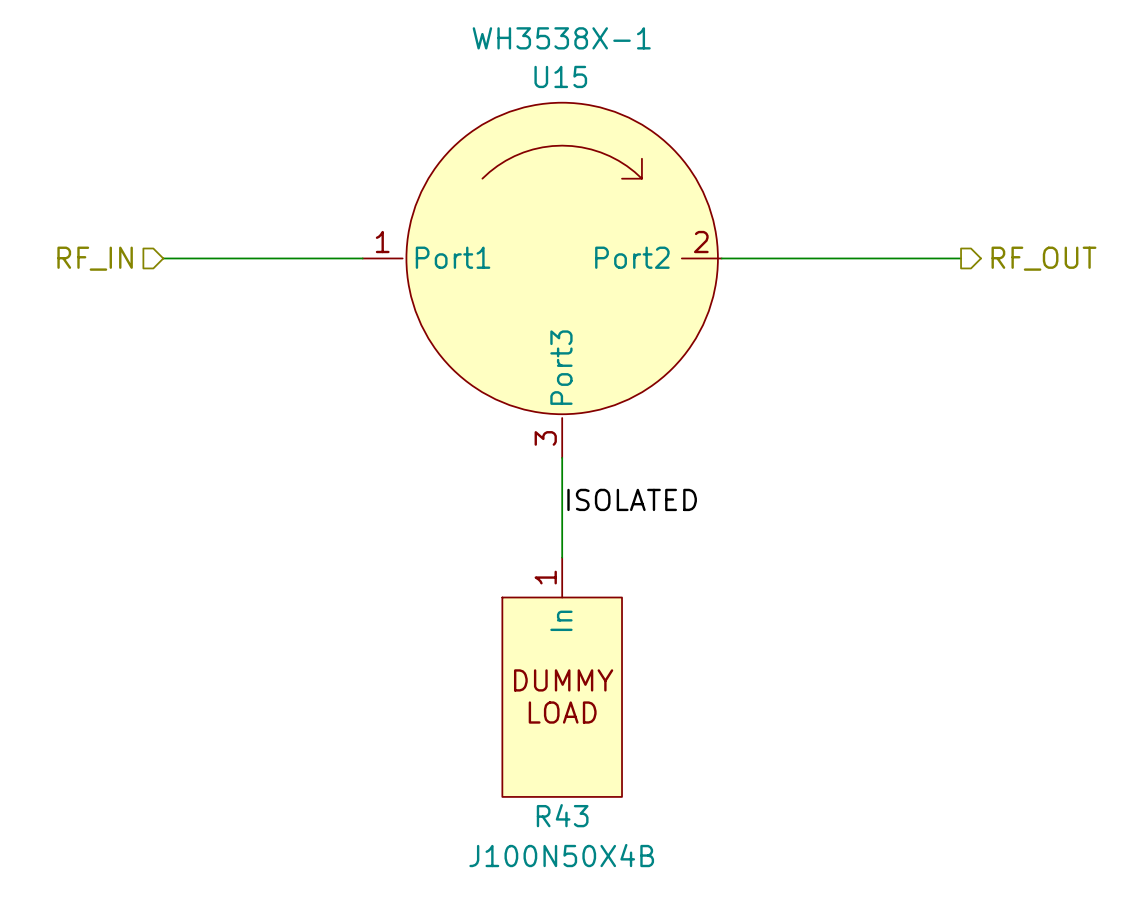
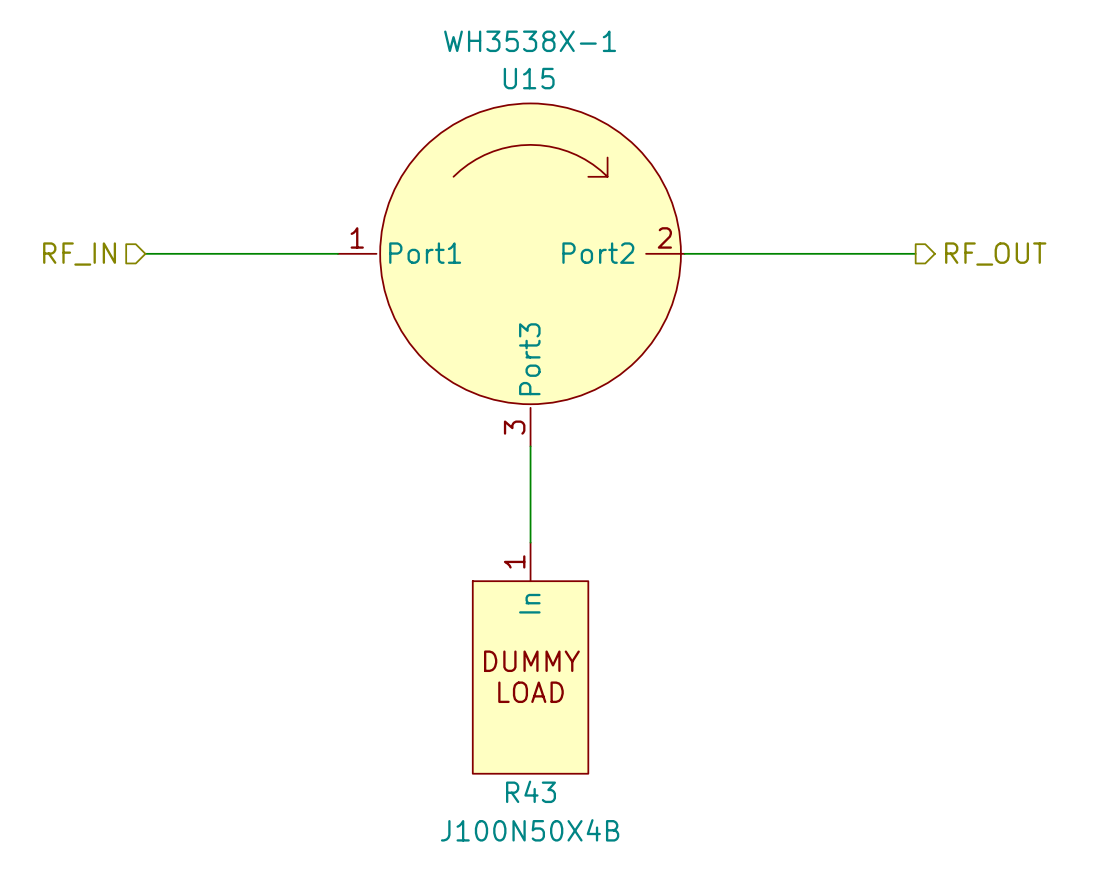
label: ISOLATED (632, 499) -> none

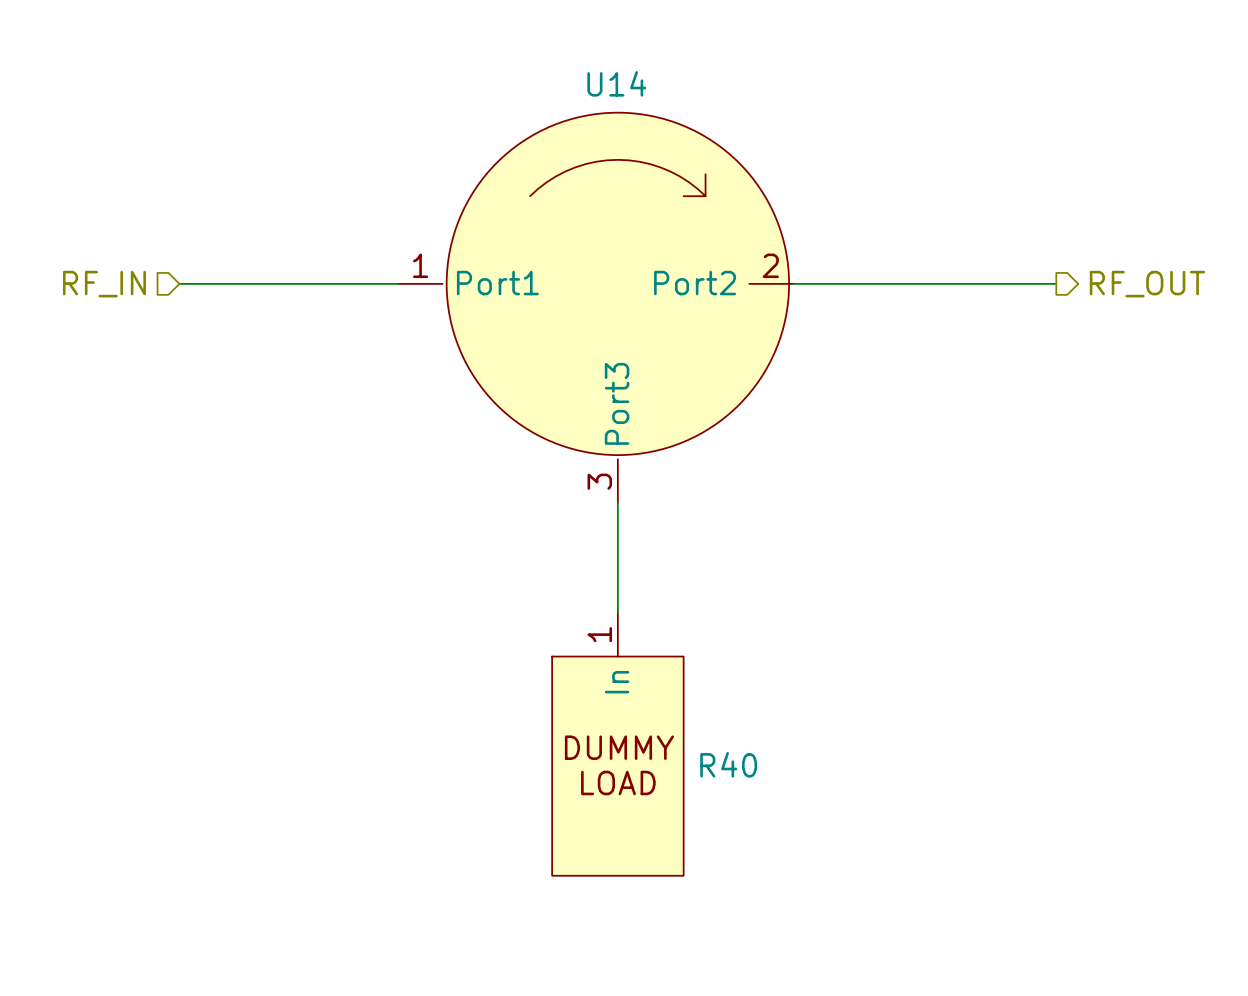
U15 value: WH3538X-1 (530, 41) -> none
U15 name: U15 (529, 78) -> U14 (616, 83)
R43 name: R43 (531, 791) -> R40 (728, 764)
R43 value: J100N50X4B (530, 830) -> none

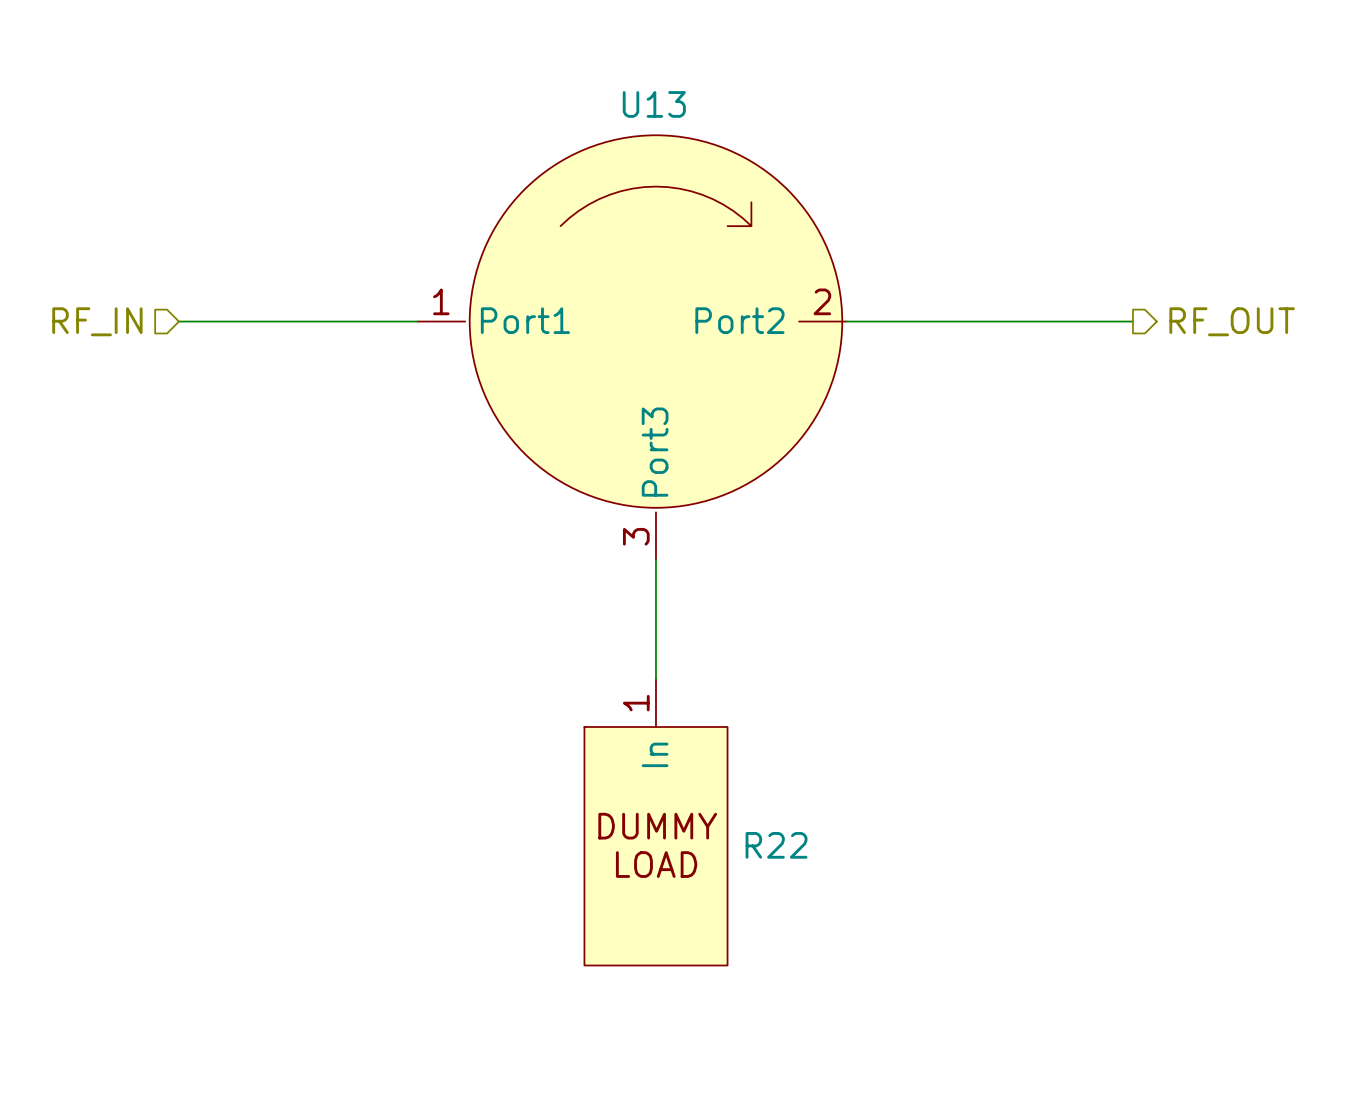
U14 name: U14 (616, 83) -> U13 (654, 104)
R40 name: R40 (728, 764) -> R22 (776, 845)

